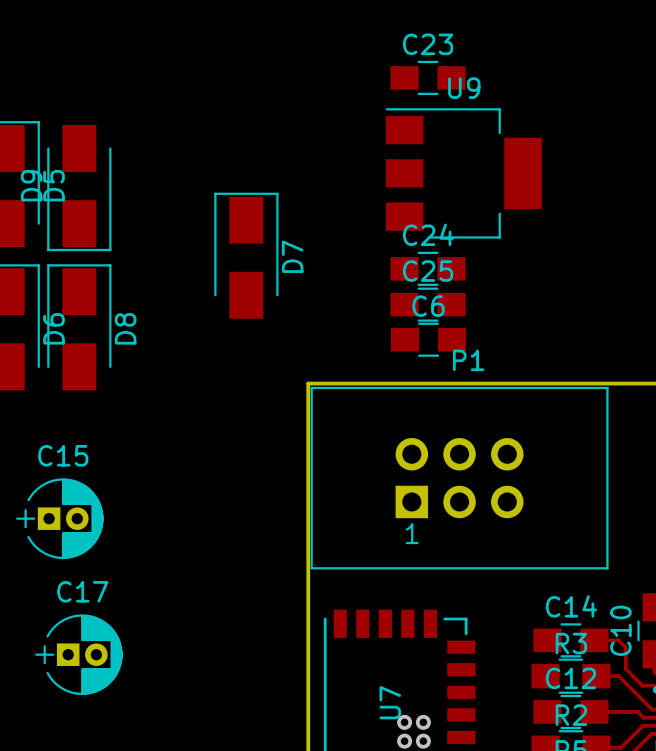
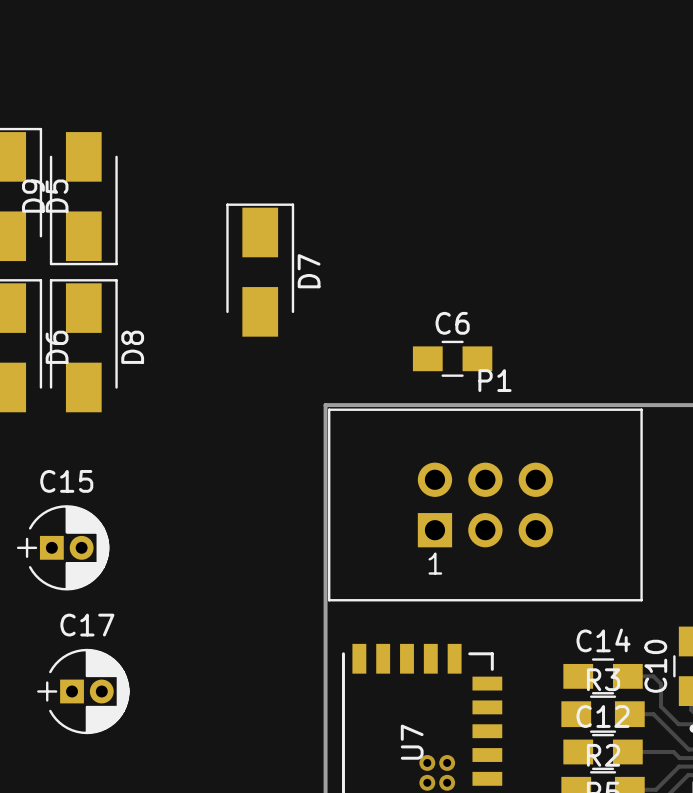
C23: (428, 77) -> none
U9: (463, 173) -> none
C24: (428, 268) -> none
C25: (428, 304) -> none

